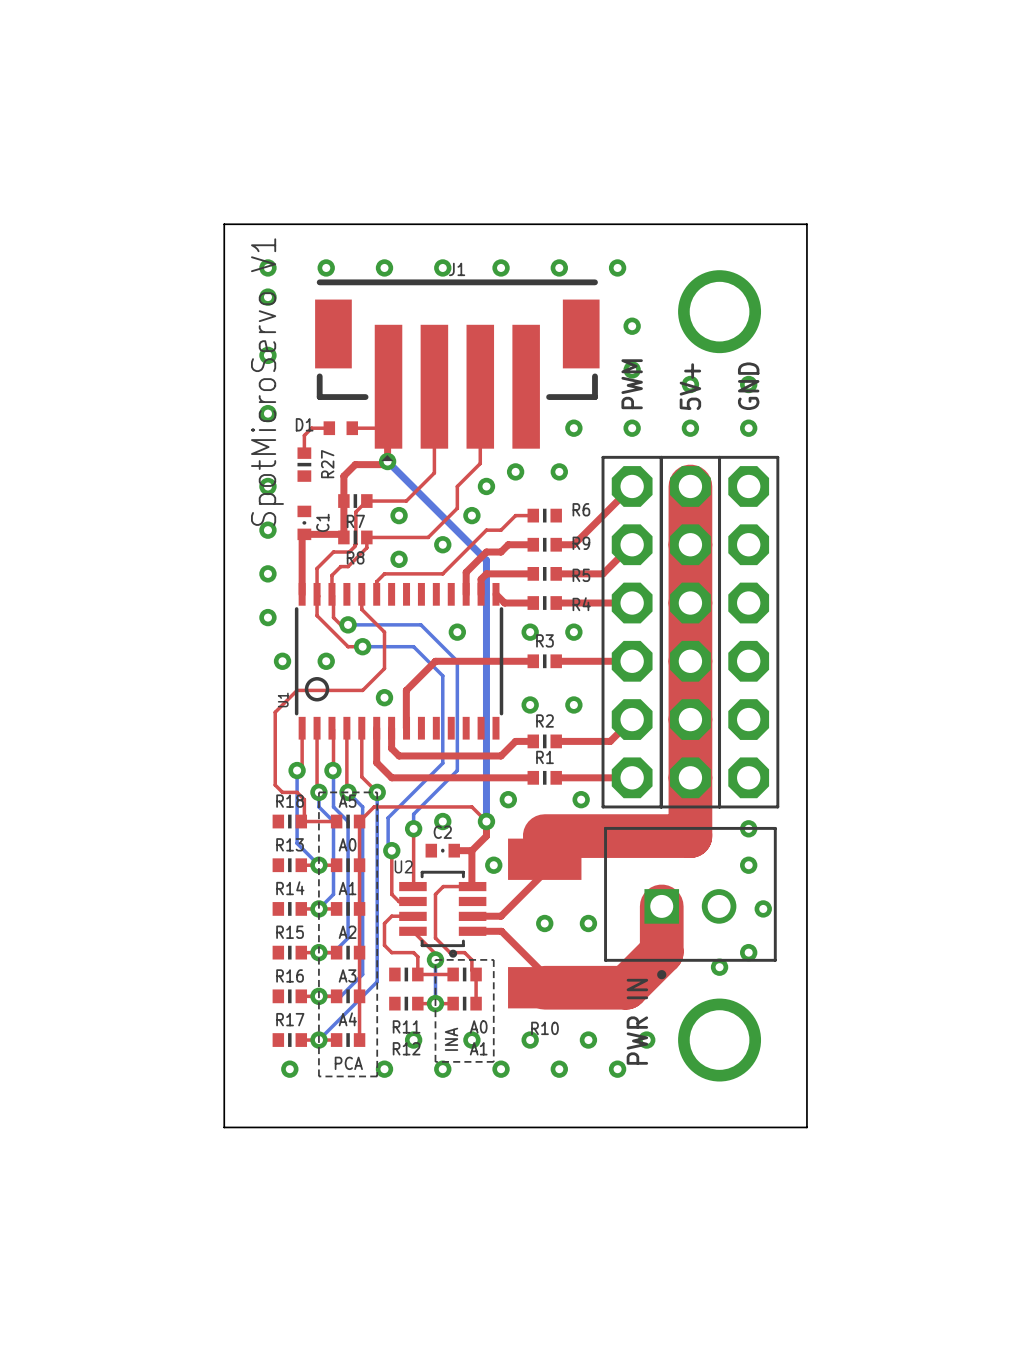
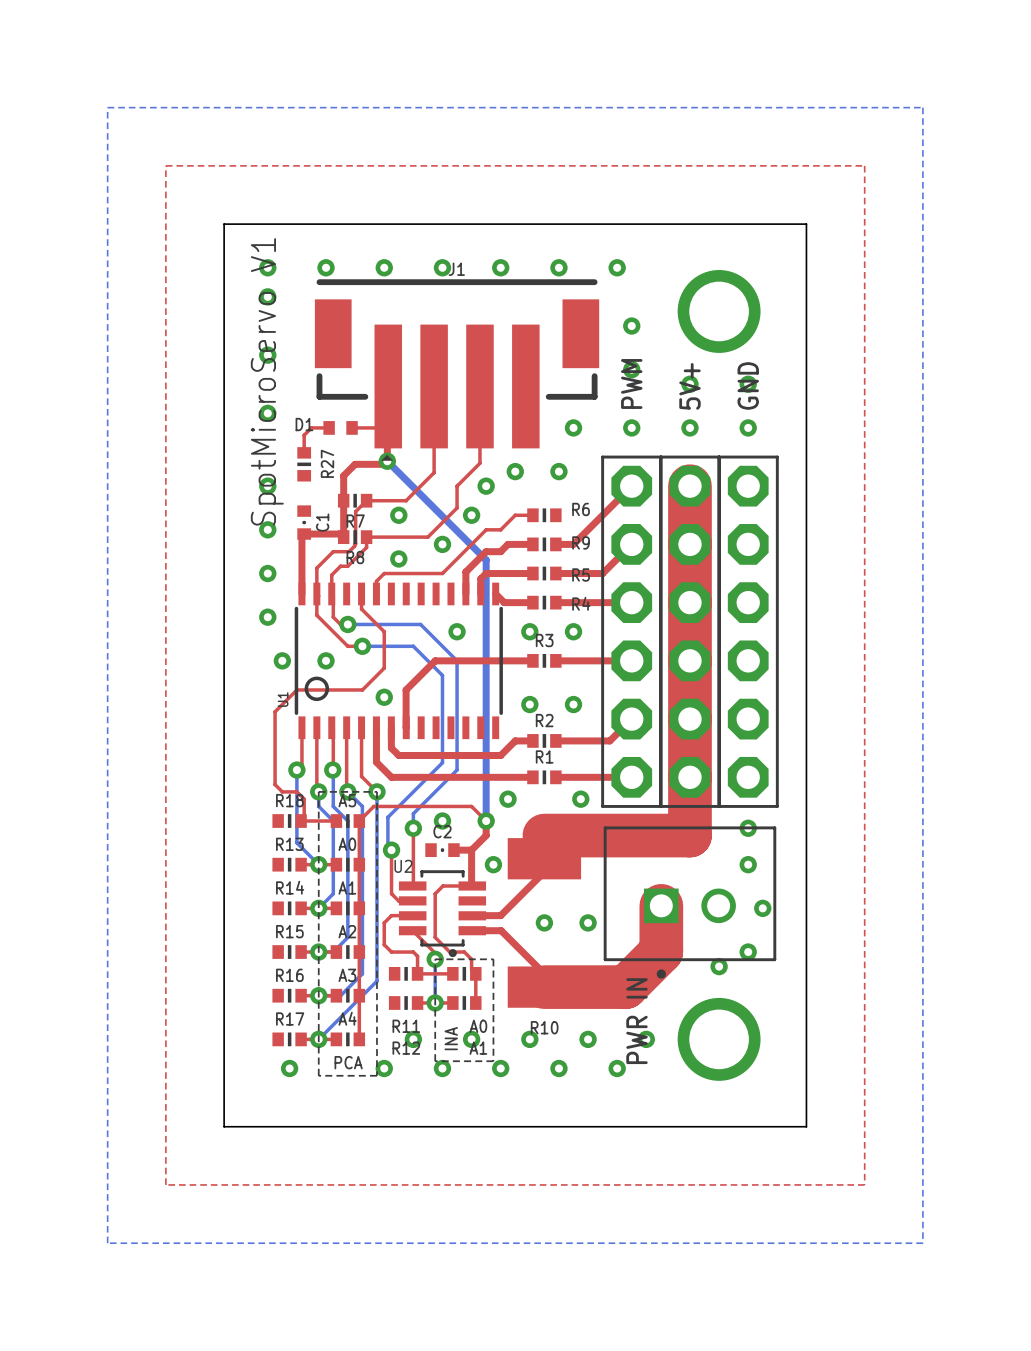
bottom zone outline: none -> (107, 107) (922, 107) (922, 1243) (107, 1243) (107, 107)
top zone outline: none -> (165, 165) (864, 165) (864, 1184) (165, 1184) (165, 165)

